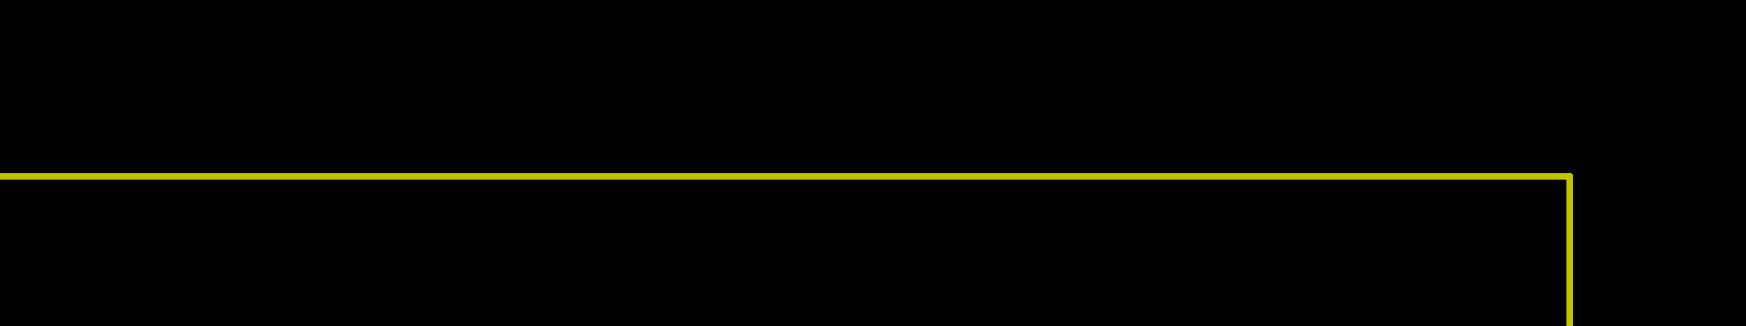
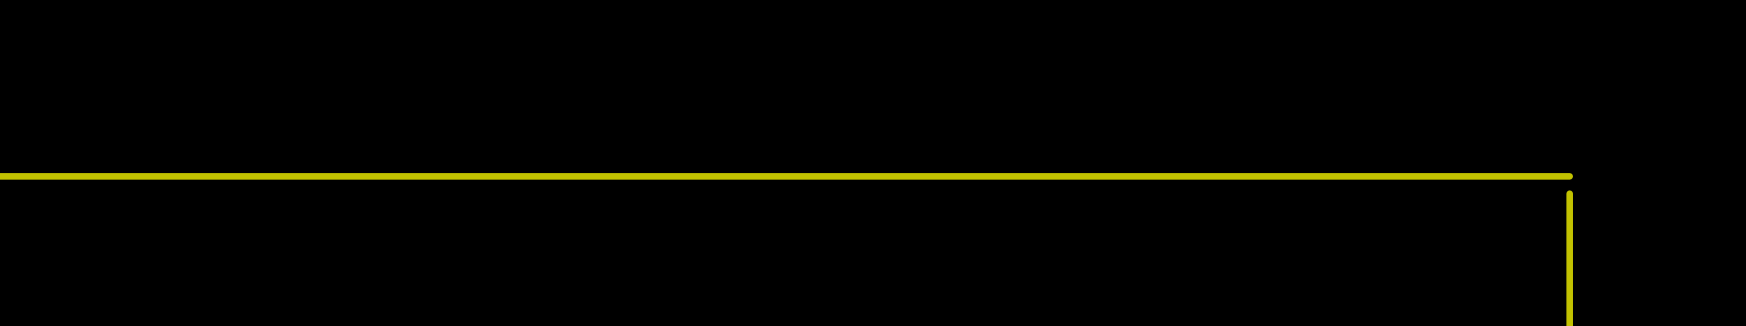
board edge: (1569, 176) (1569, 193) -> none

